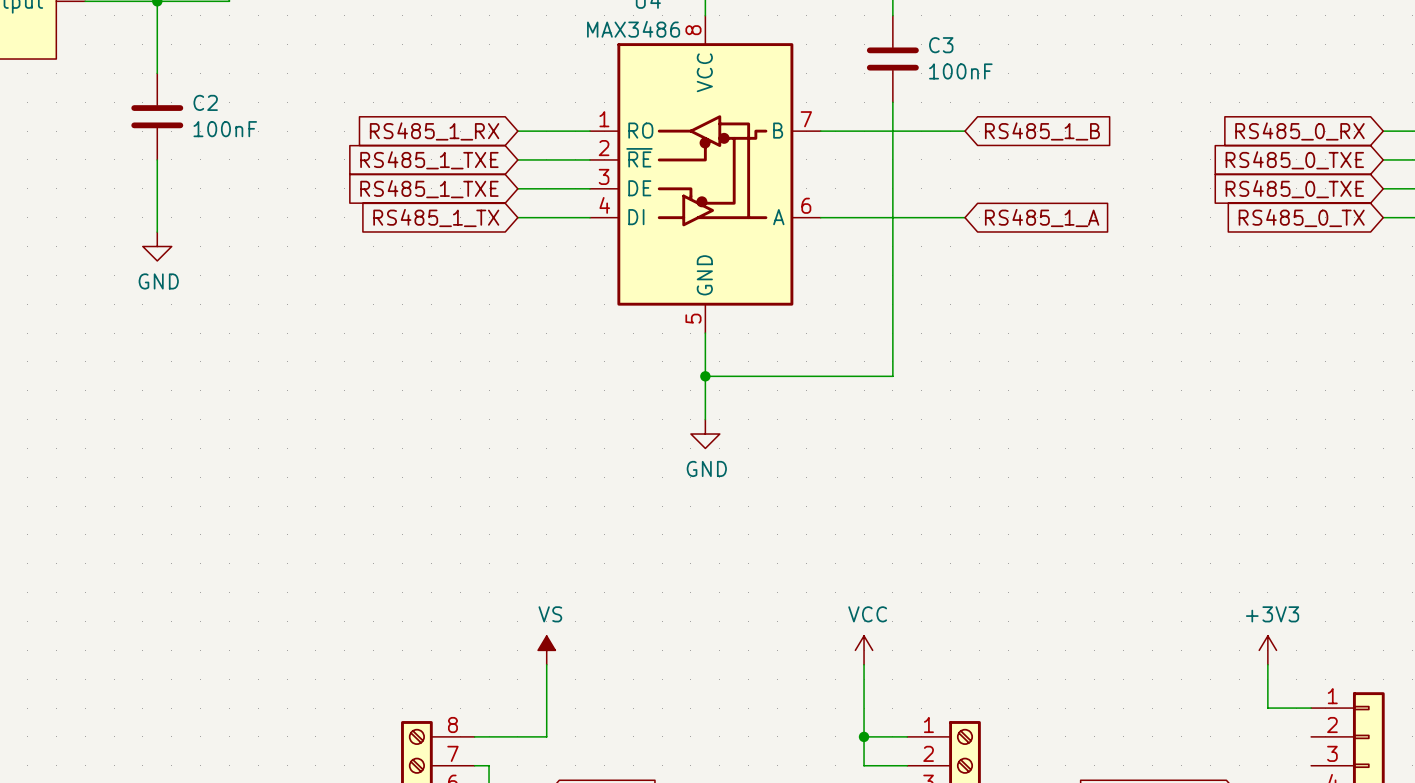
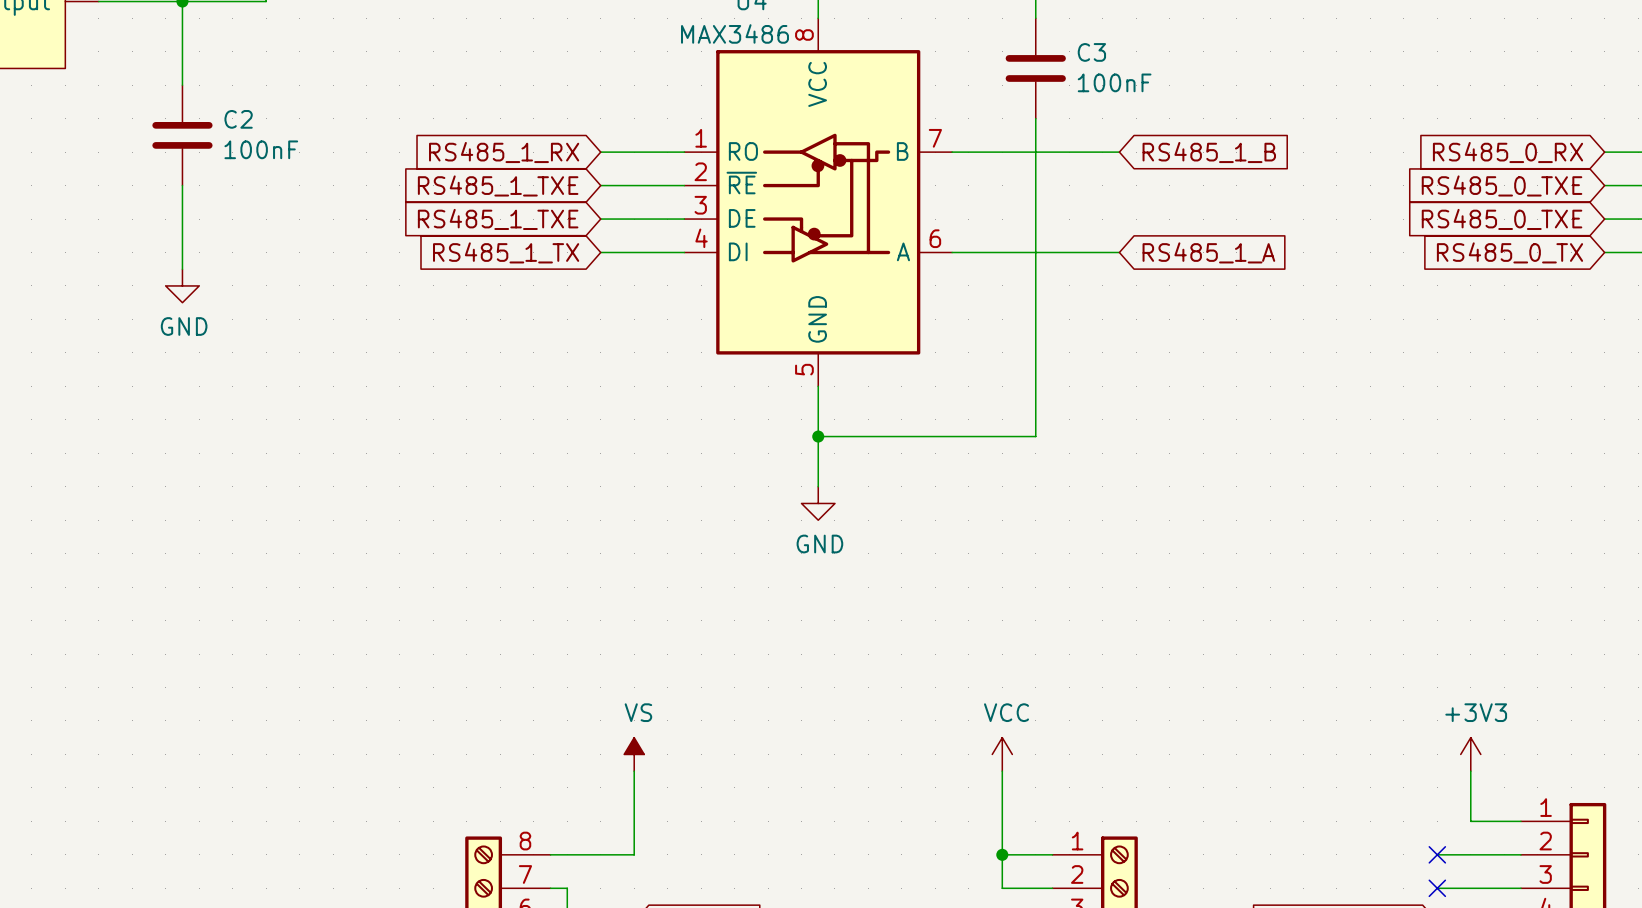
wire: none -> (1437, 854) (1520, 854)
no-connect mark: none -> (1437, 854)
wire: none -> (1437, 888) (1520, 888)
no-connect mark: none -> (1437, 888)

